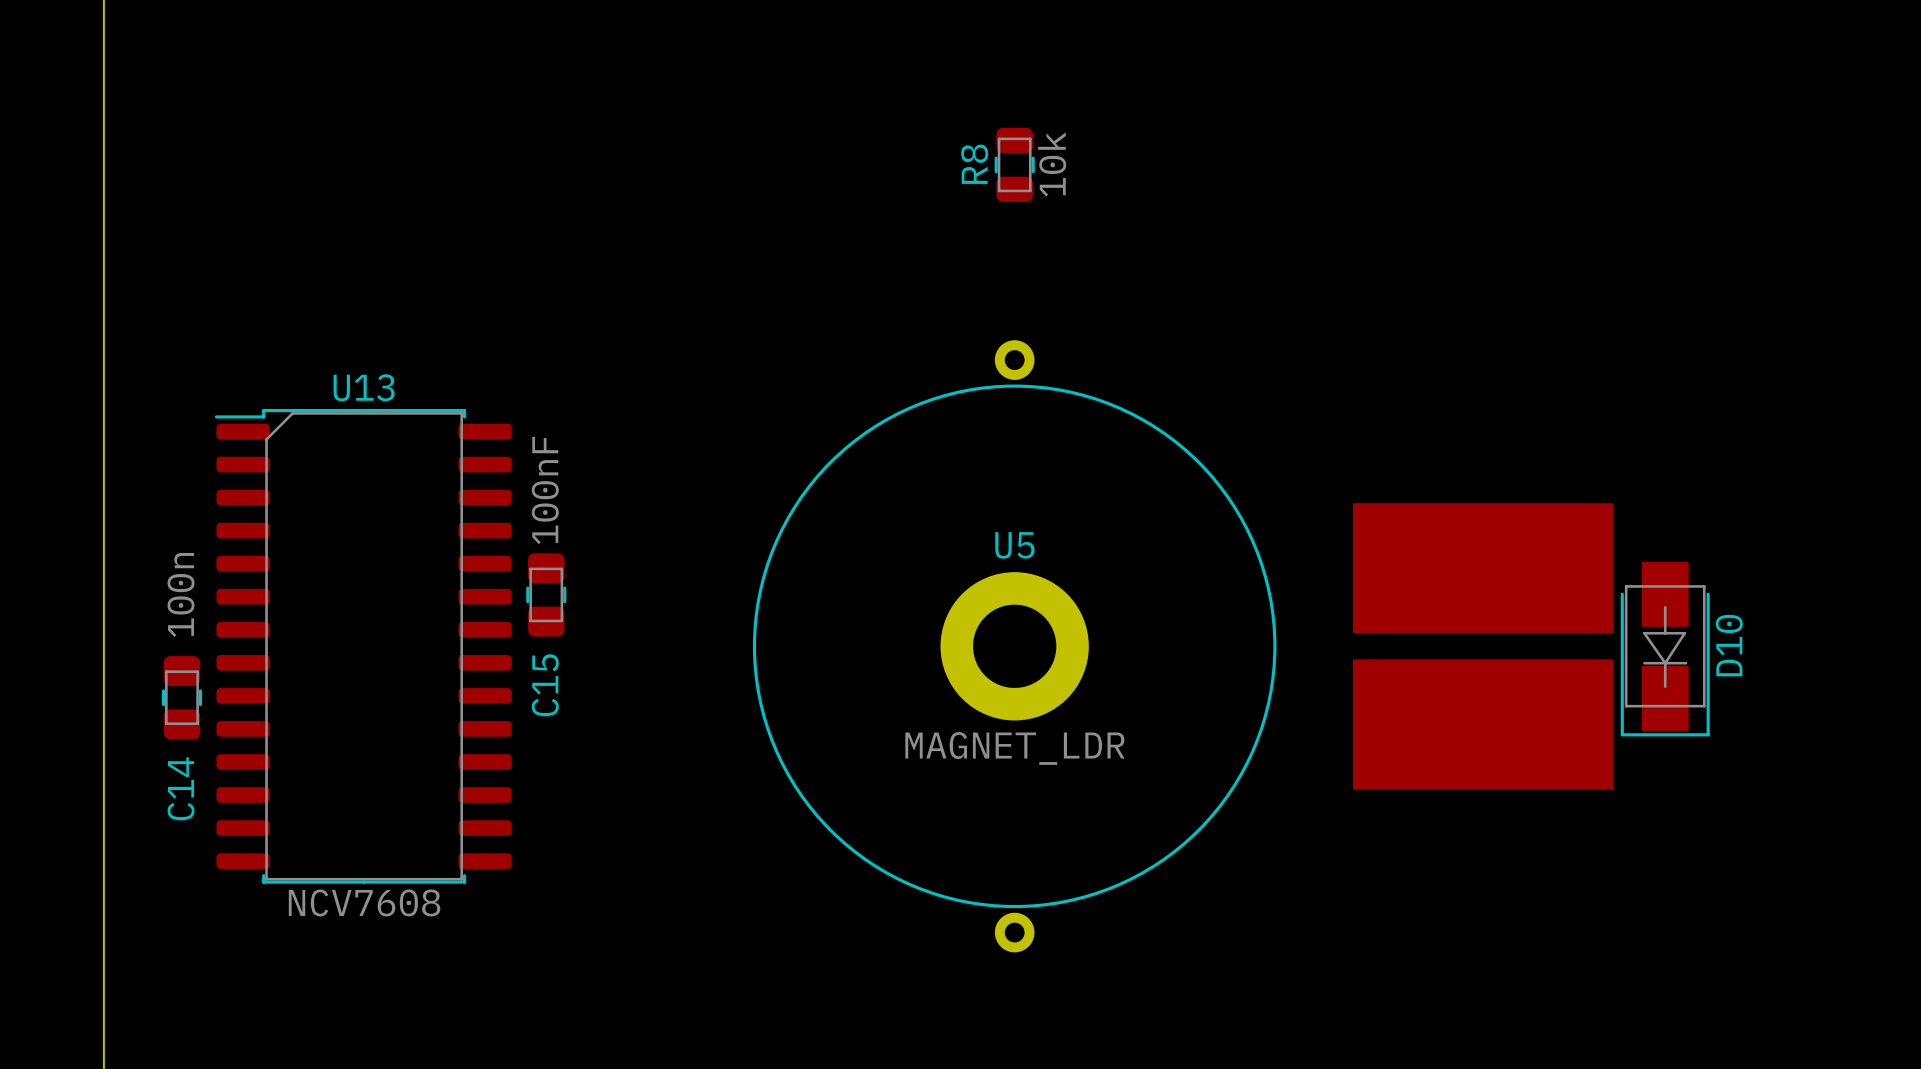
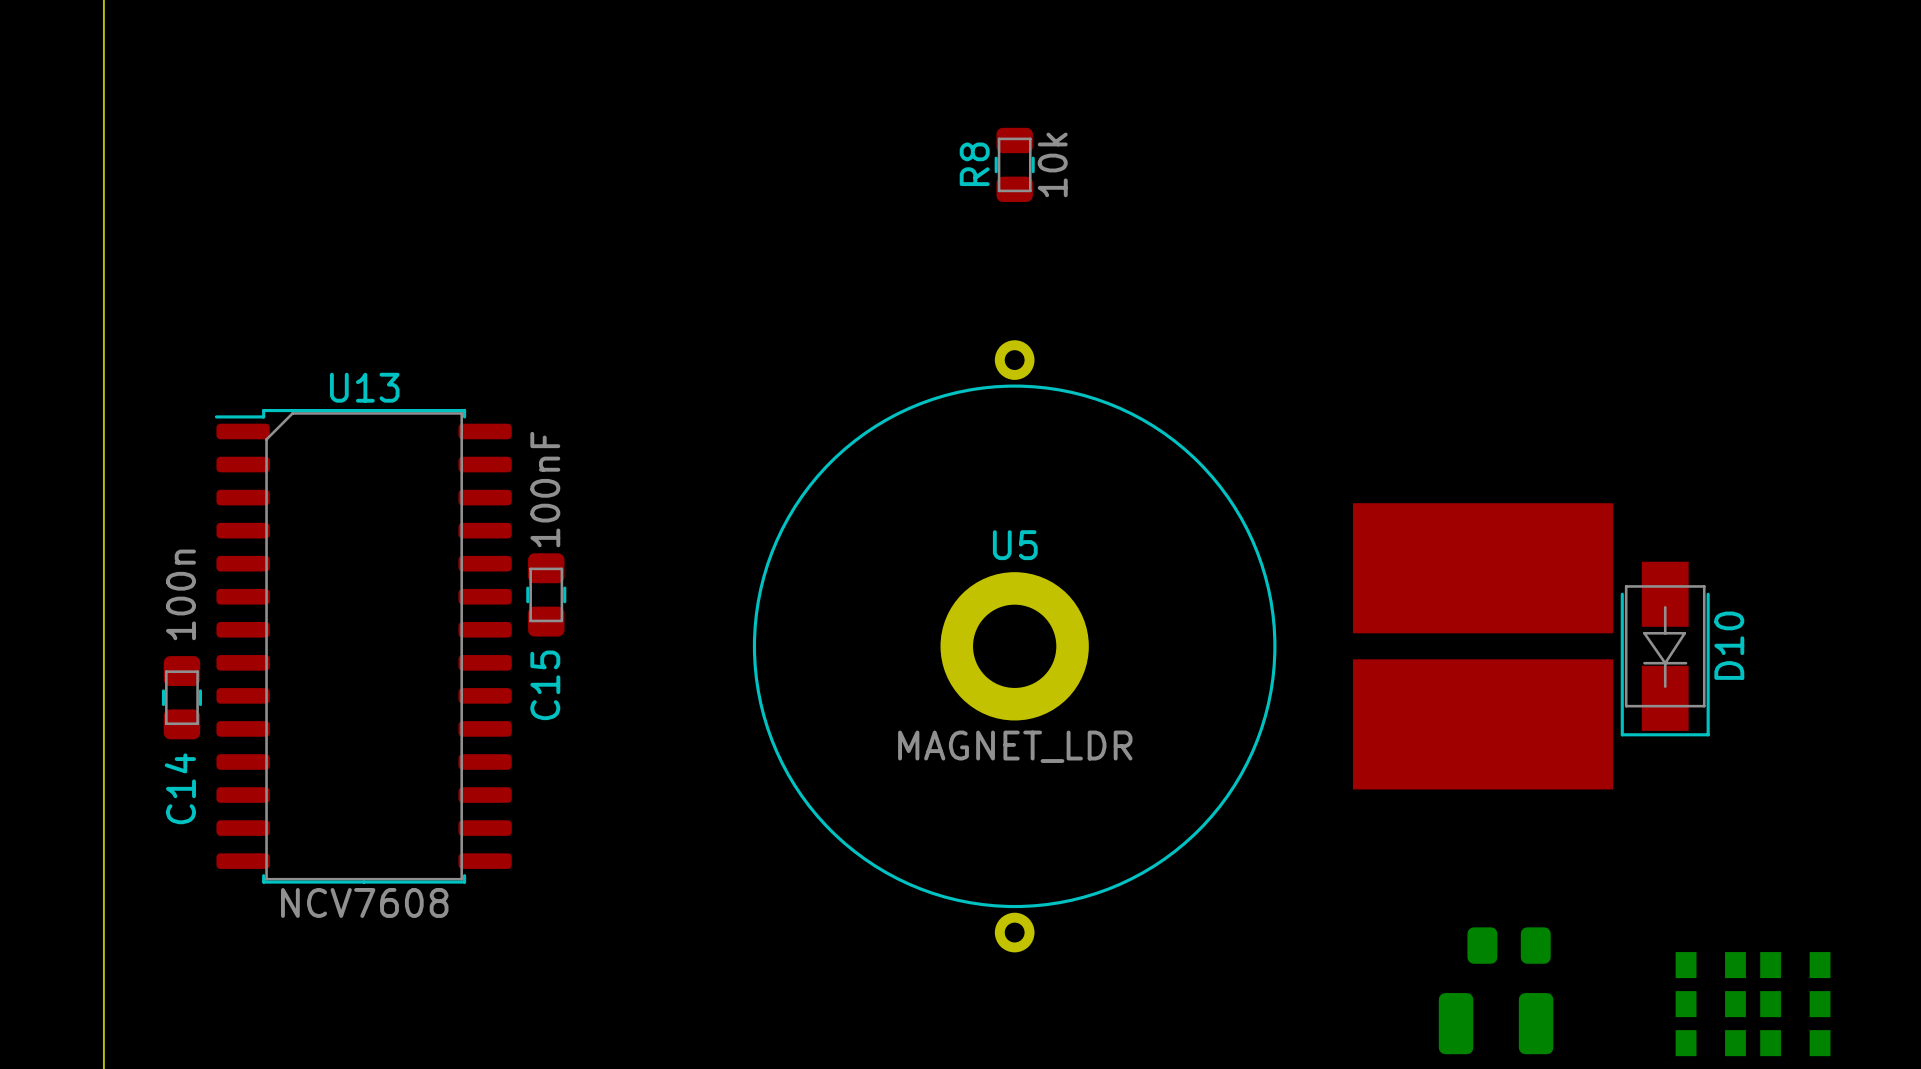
part: none -> (1509, 945)
part: none -> (1710, 965)
part: none -> (1795, 965)
part: none -> (1710, 1004)
part: none -> (1795, 1004)
part: none -> (1496, 1023)
part: none -> (1710, 1043)
part: none -> (1795, 1043)

